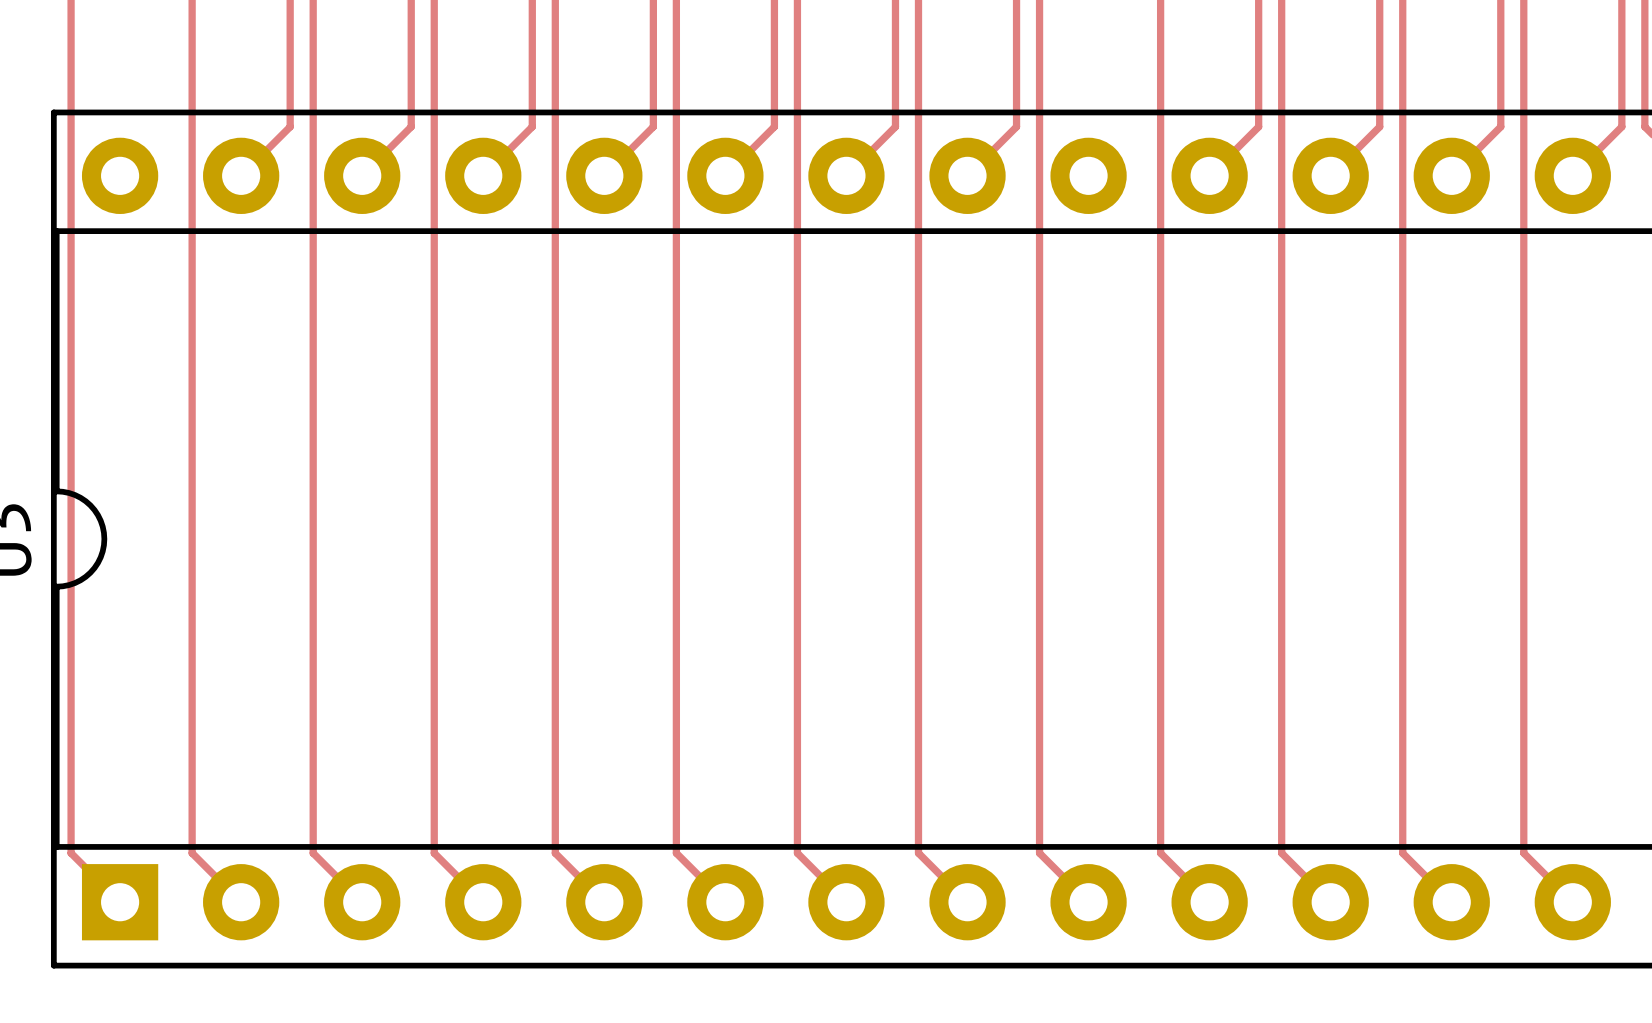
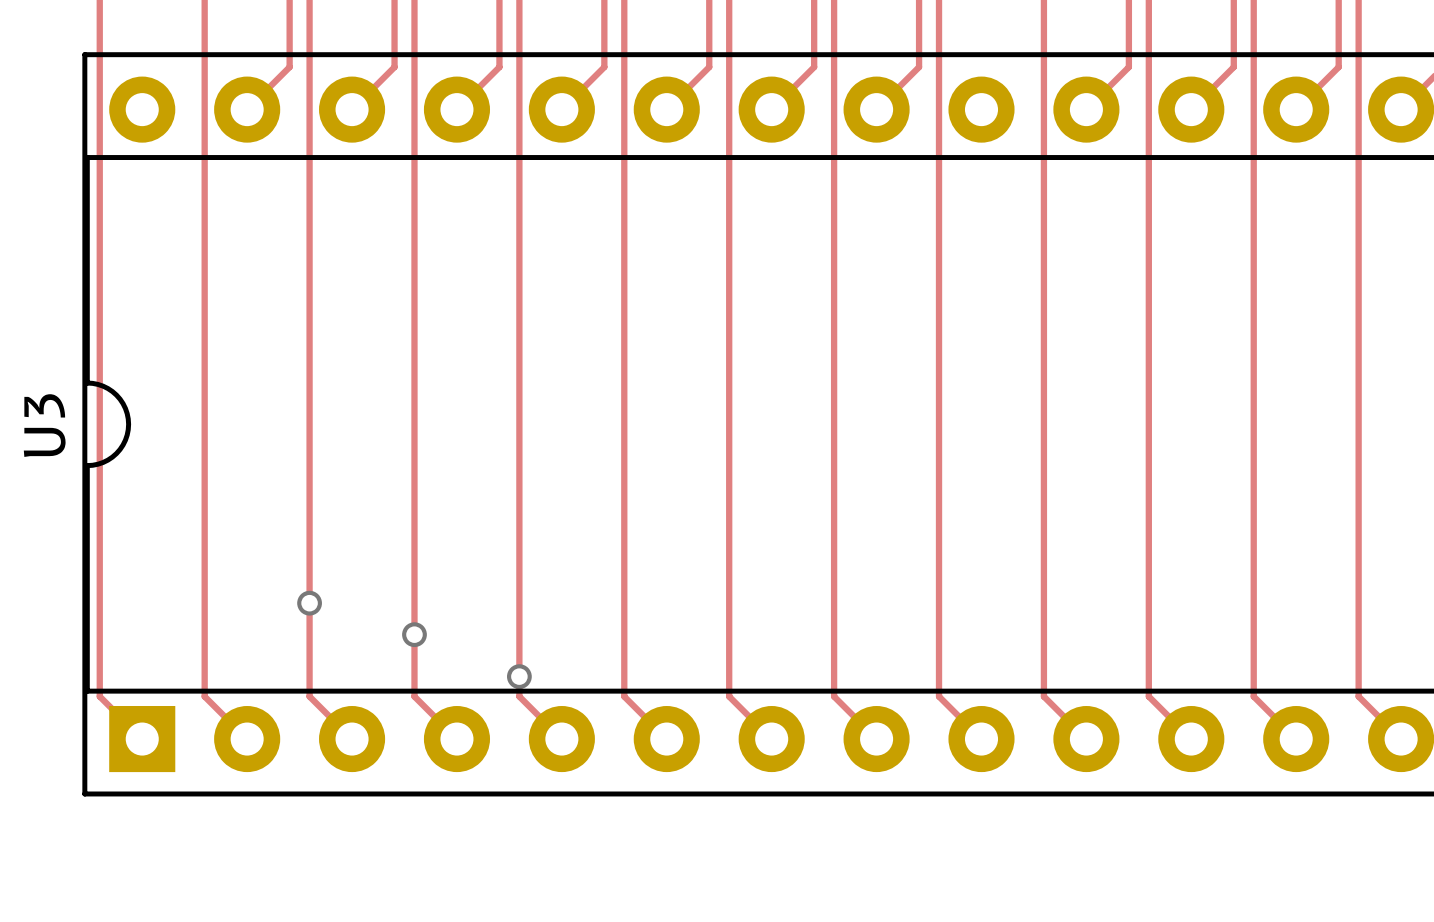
via: none -> (309, 603)
via: none -> (414, 634)
via: none -> (519, 676)

